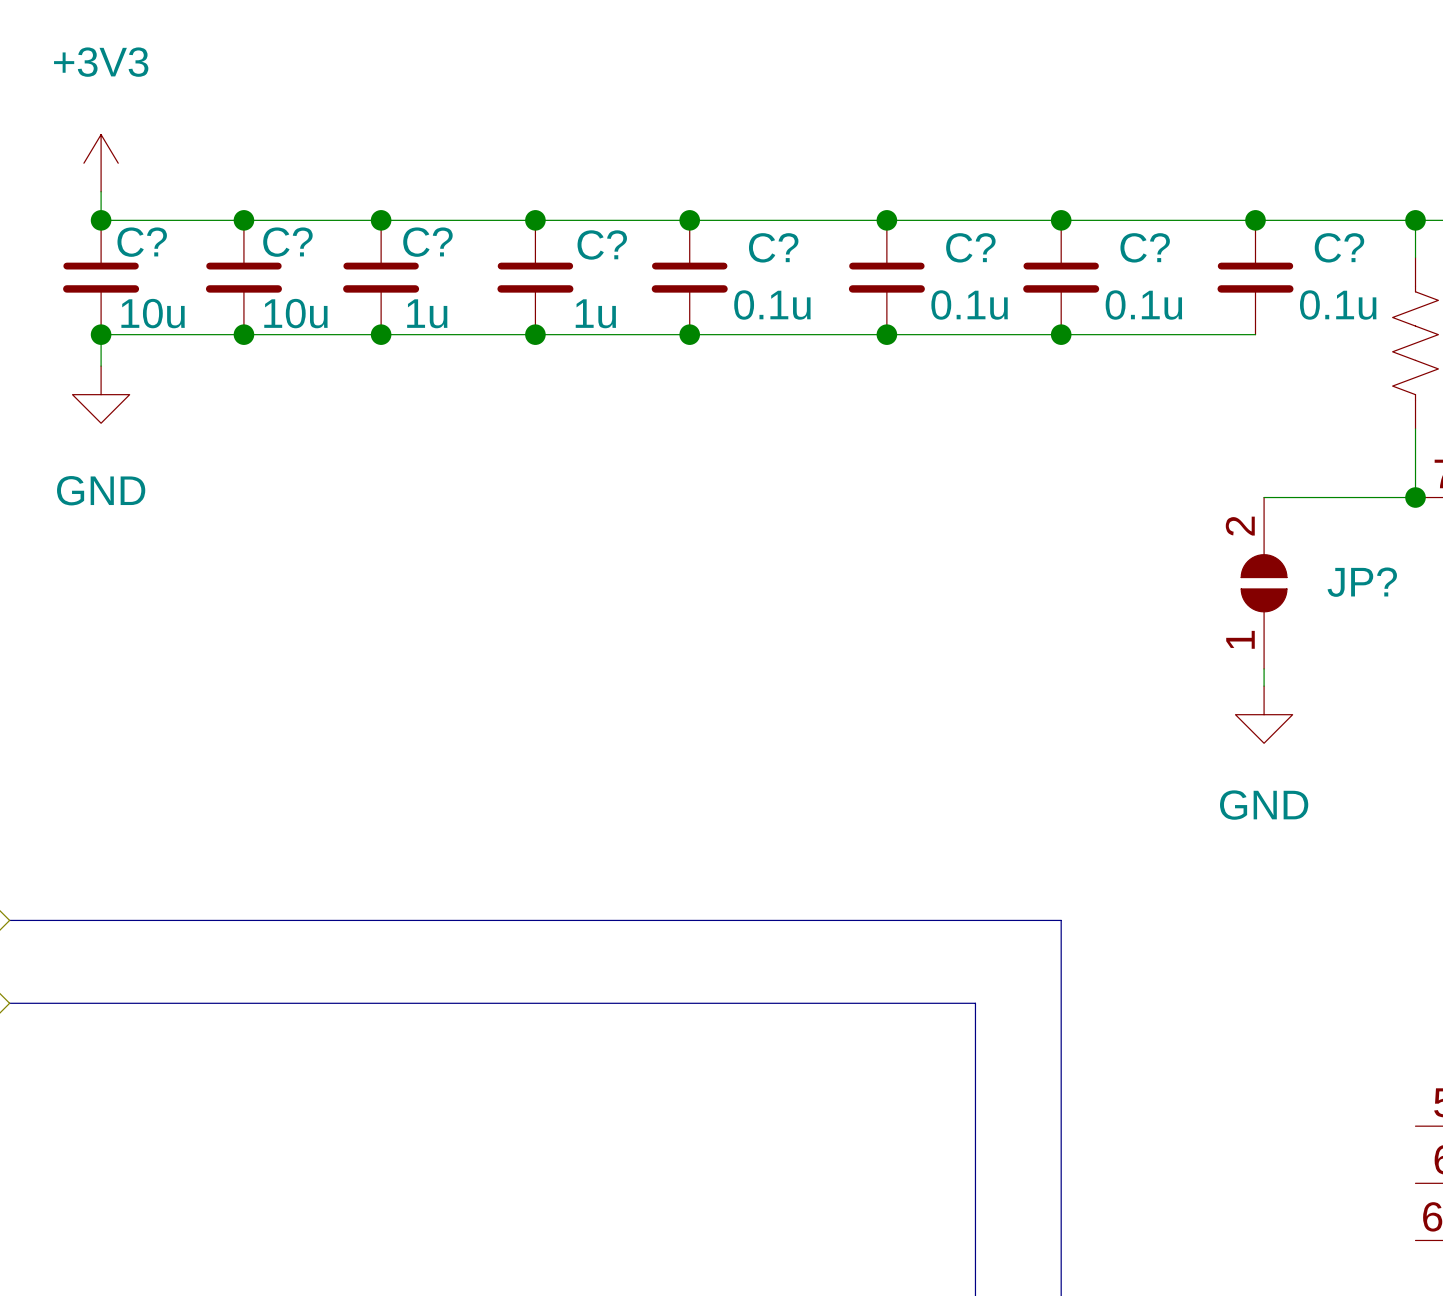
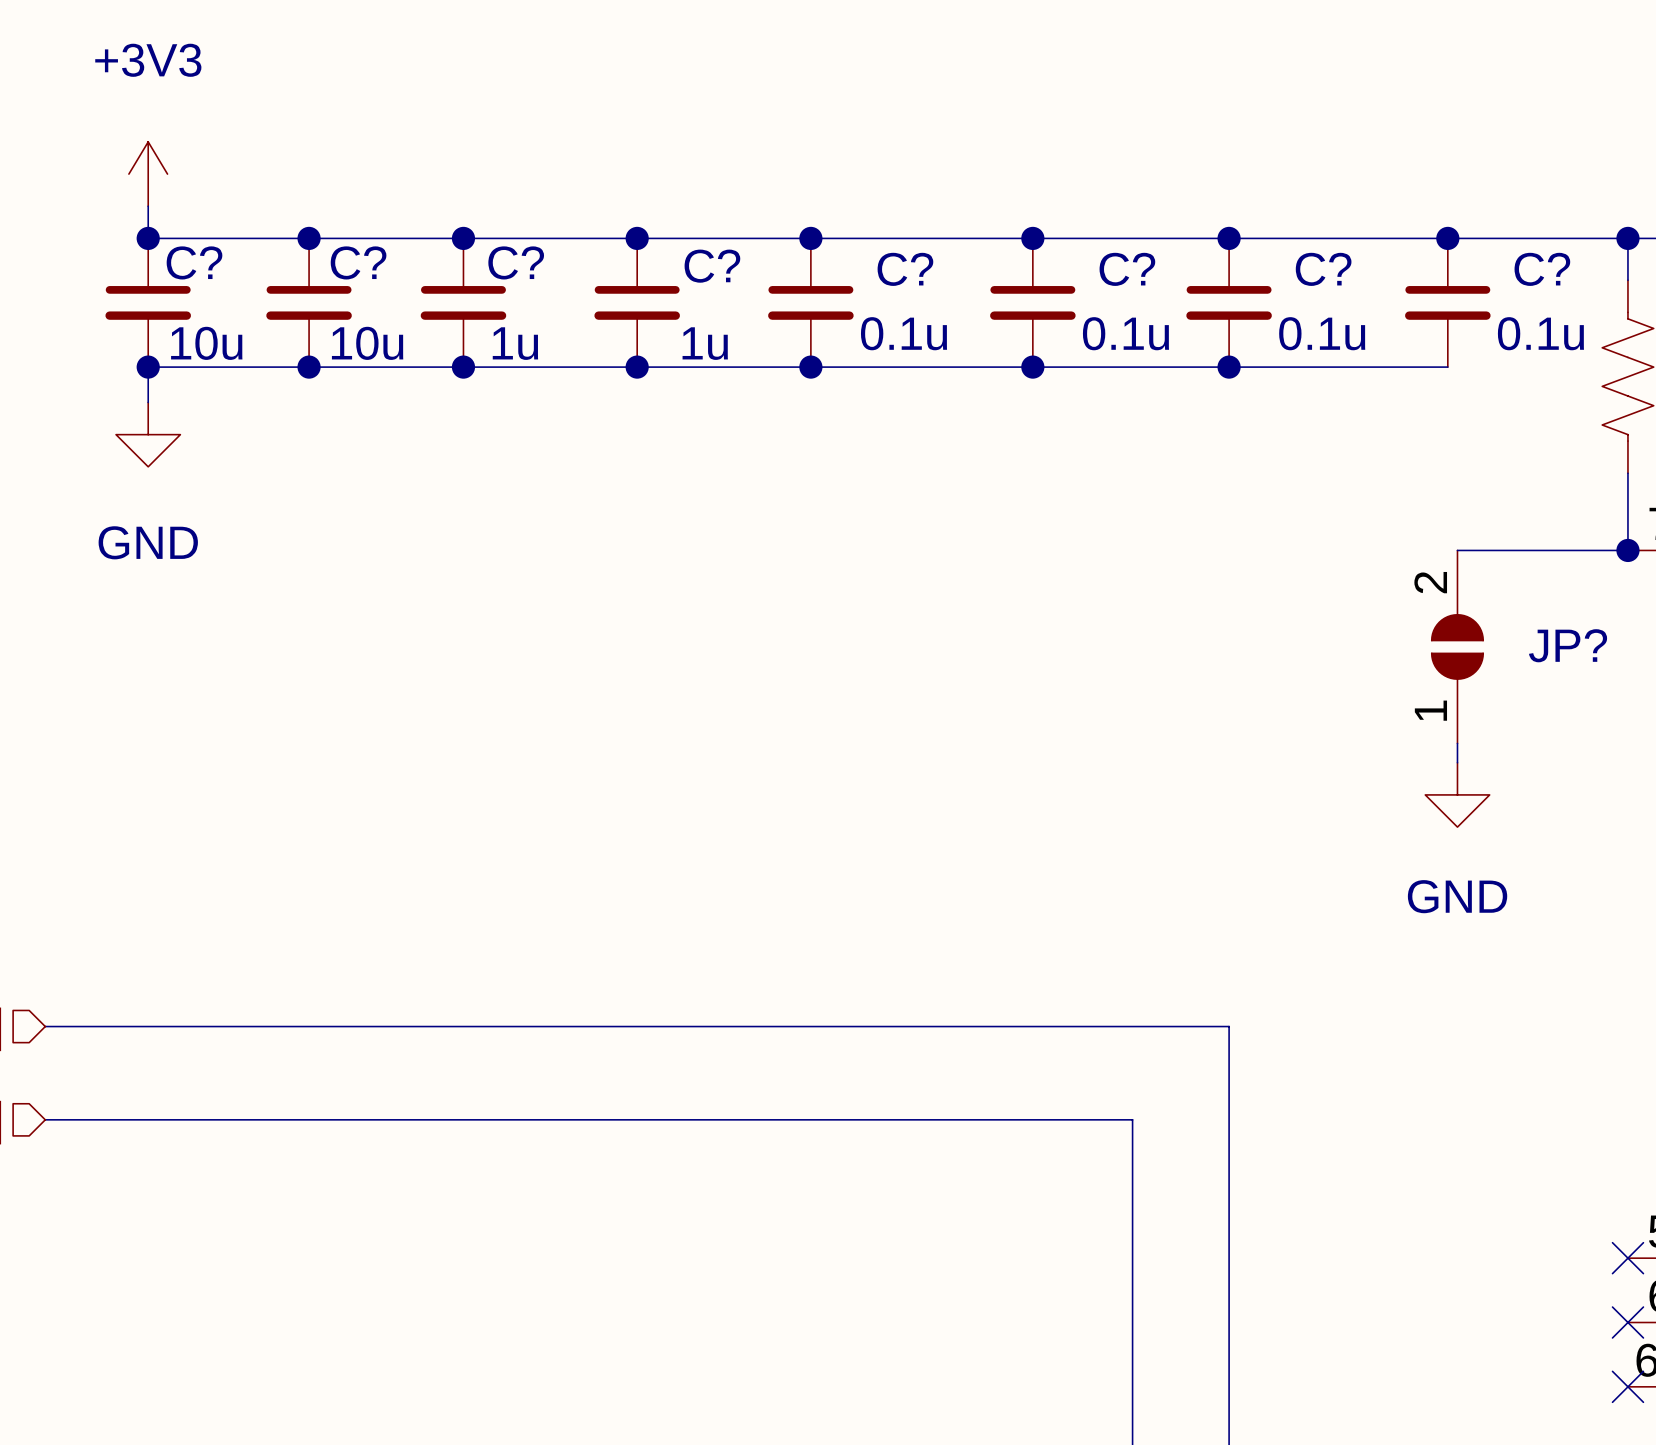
no-connect mark: none -> (1627, 1258)
no-connect mark: none -> (1627, 1322)
no-connect mark: none -> (1627, 1386)

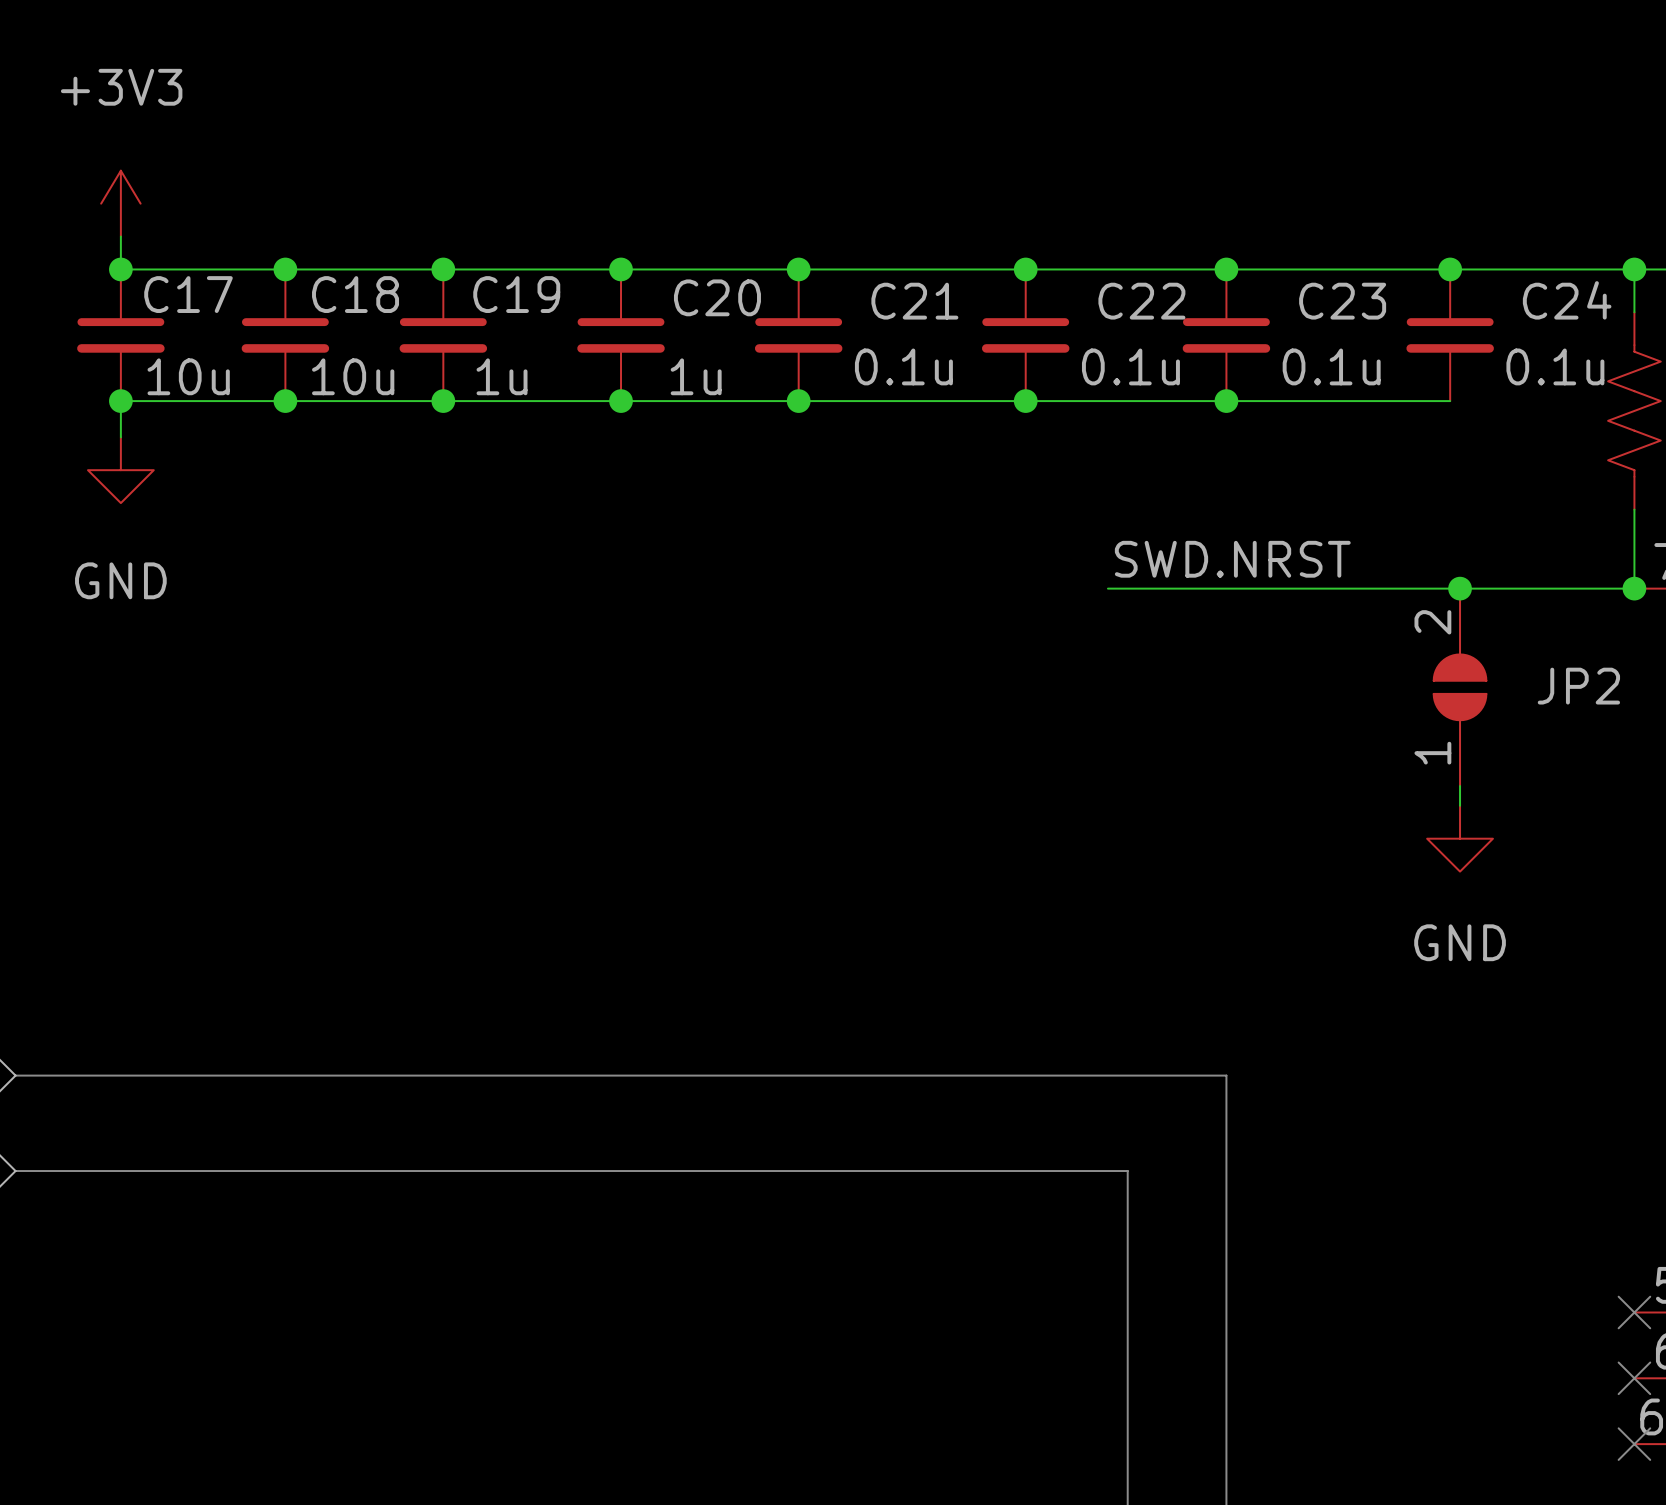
C? name: C? (194, 262) -> C17 (188, 294)
C? name: C? (358, 262) -> C18 (355, 294)
C? name: C? (516, 262) -> C19 (516, 294)
C? name: C? (712, 266) -> C20 (717, 297)
C? name: C? (905, 269) -> C21 (914, 301)
C? name: C? (1127, 269) -> C22 (1141, 301)
C? name: C? (1323, 269) -> C23 (1342, 301)
C? name: C? (1542, 269) -> C24 (1567, 300)
label: none -> SWD.NRST (1232, 559)
wire: none -> (1107, 588) (1460, 588)
junction: none -> (1460, 588)
JP? name: JP? (1568, 645) -> JP2 (1578, 686)

